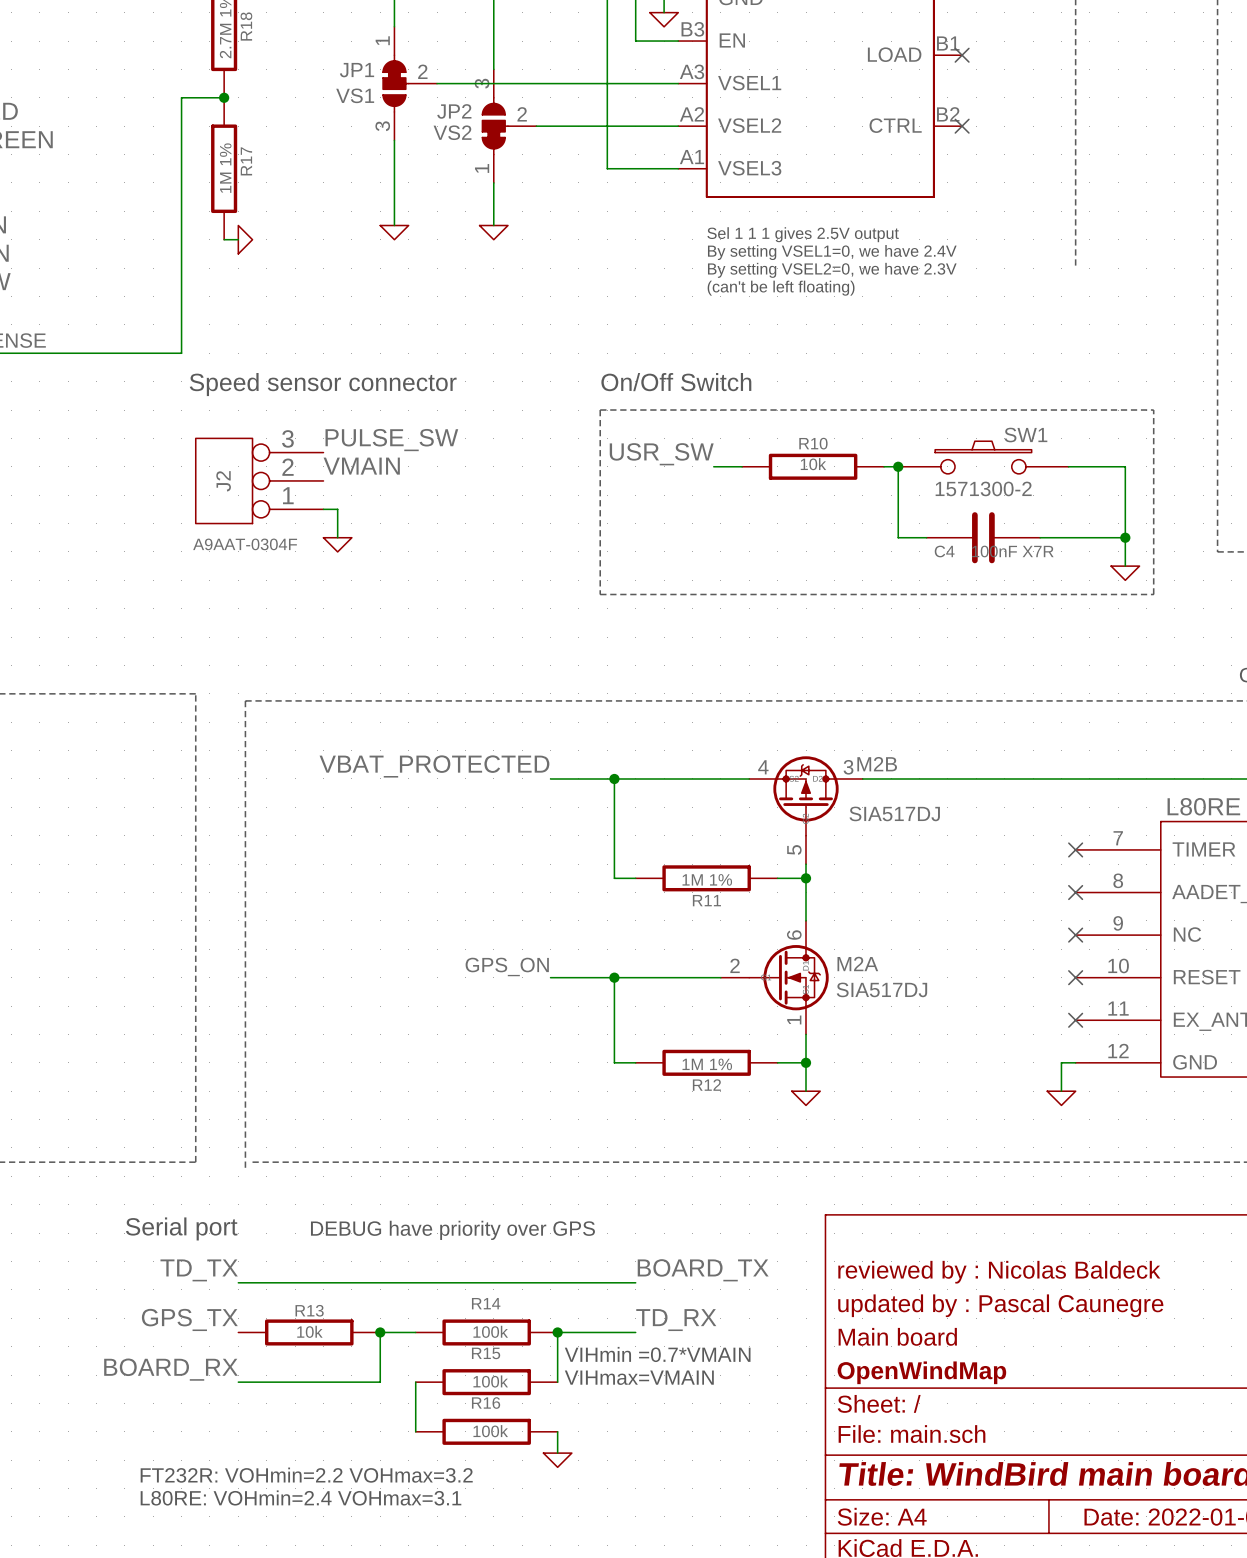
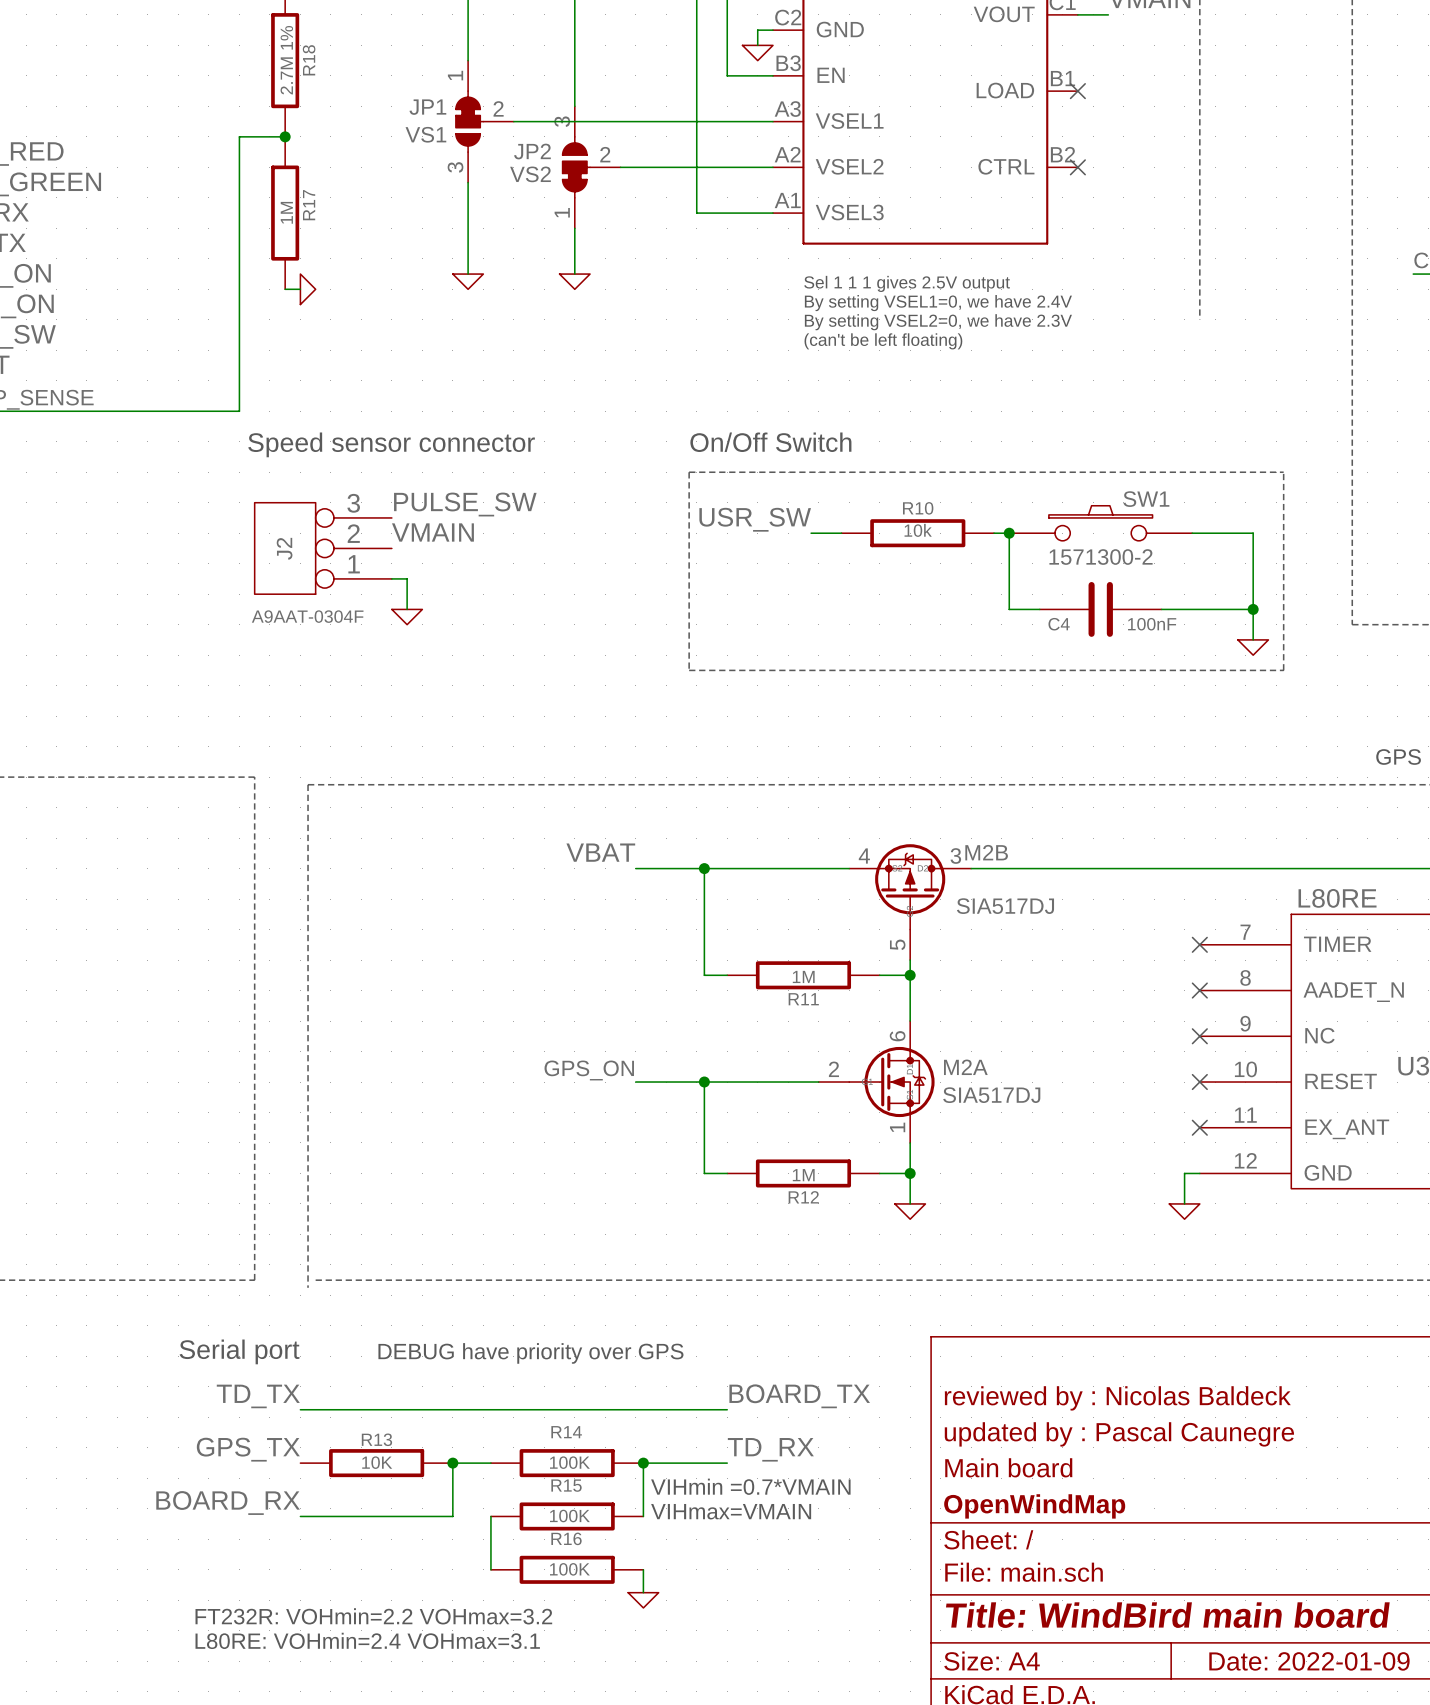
R17 value: 1M 1% (225, 168) -> 1M (286, 212)
C4 value: 100nF X7R (1012, 551) -> 100nF (1152, 624)
label: VBAT_PROTECTED (434, 766) -> VBAT (600, 852)
R11 value: 1M 1% (707, 879) -> 1M (803, 976)
R12 value: 1M 1% (707, 1064) -> 1M (803, 1175)
R13 value: 10k (309, 1331) -> 10K (377, 1462)
R14 value: 100k (490, 1331) -> 100K (569, 1462)
R15 value: 100k (490, 1381) -> 100K (569, 1516)
R16 value: 100k (490, 1431) -> 100K (569, 1569)

